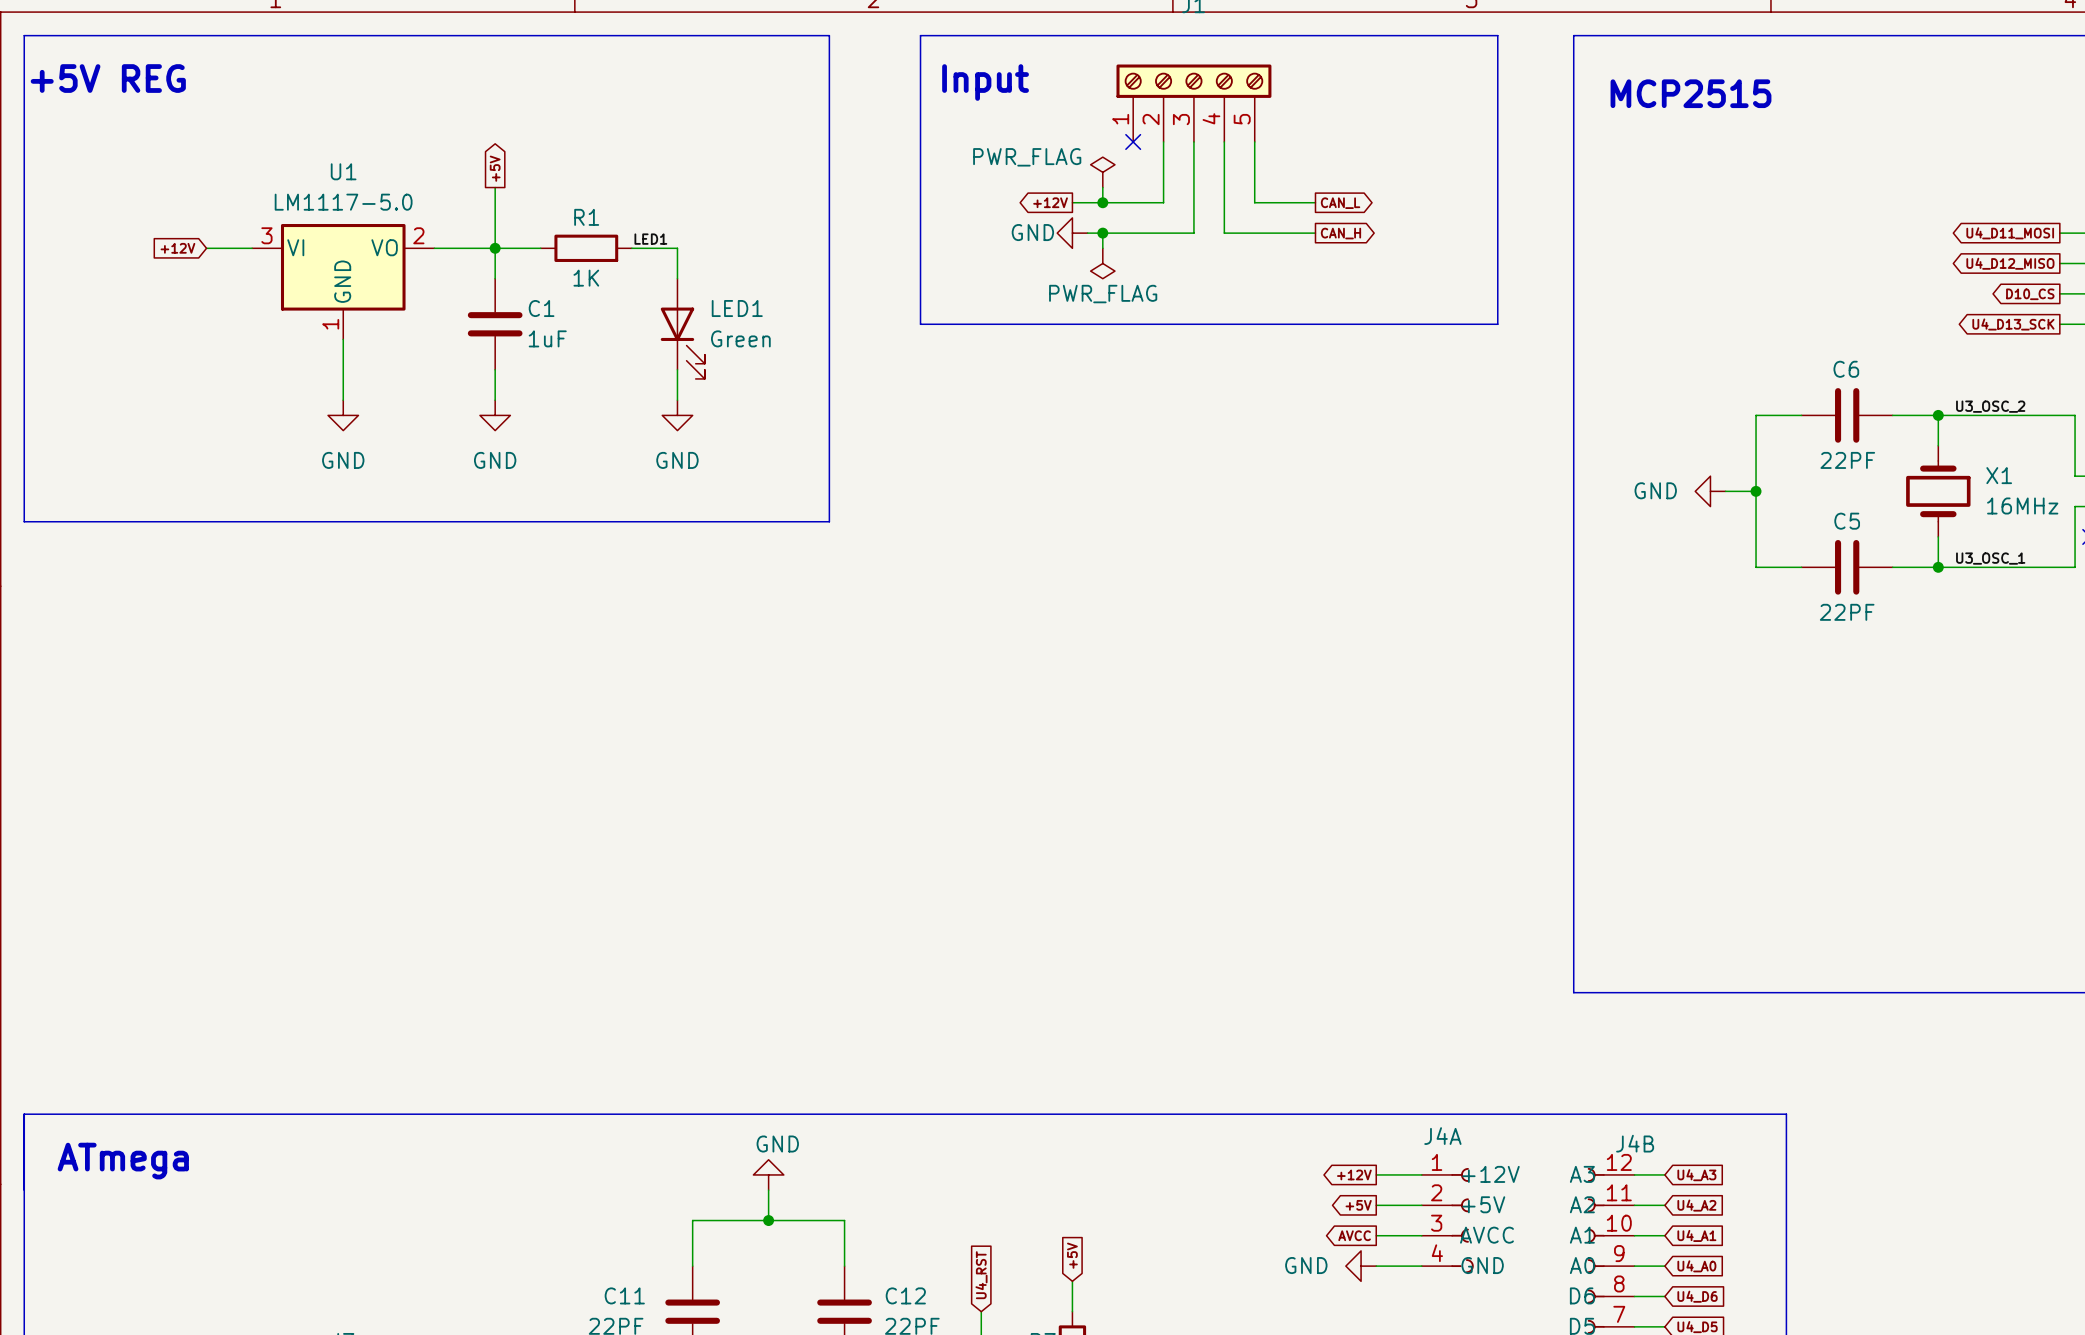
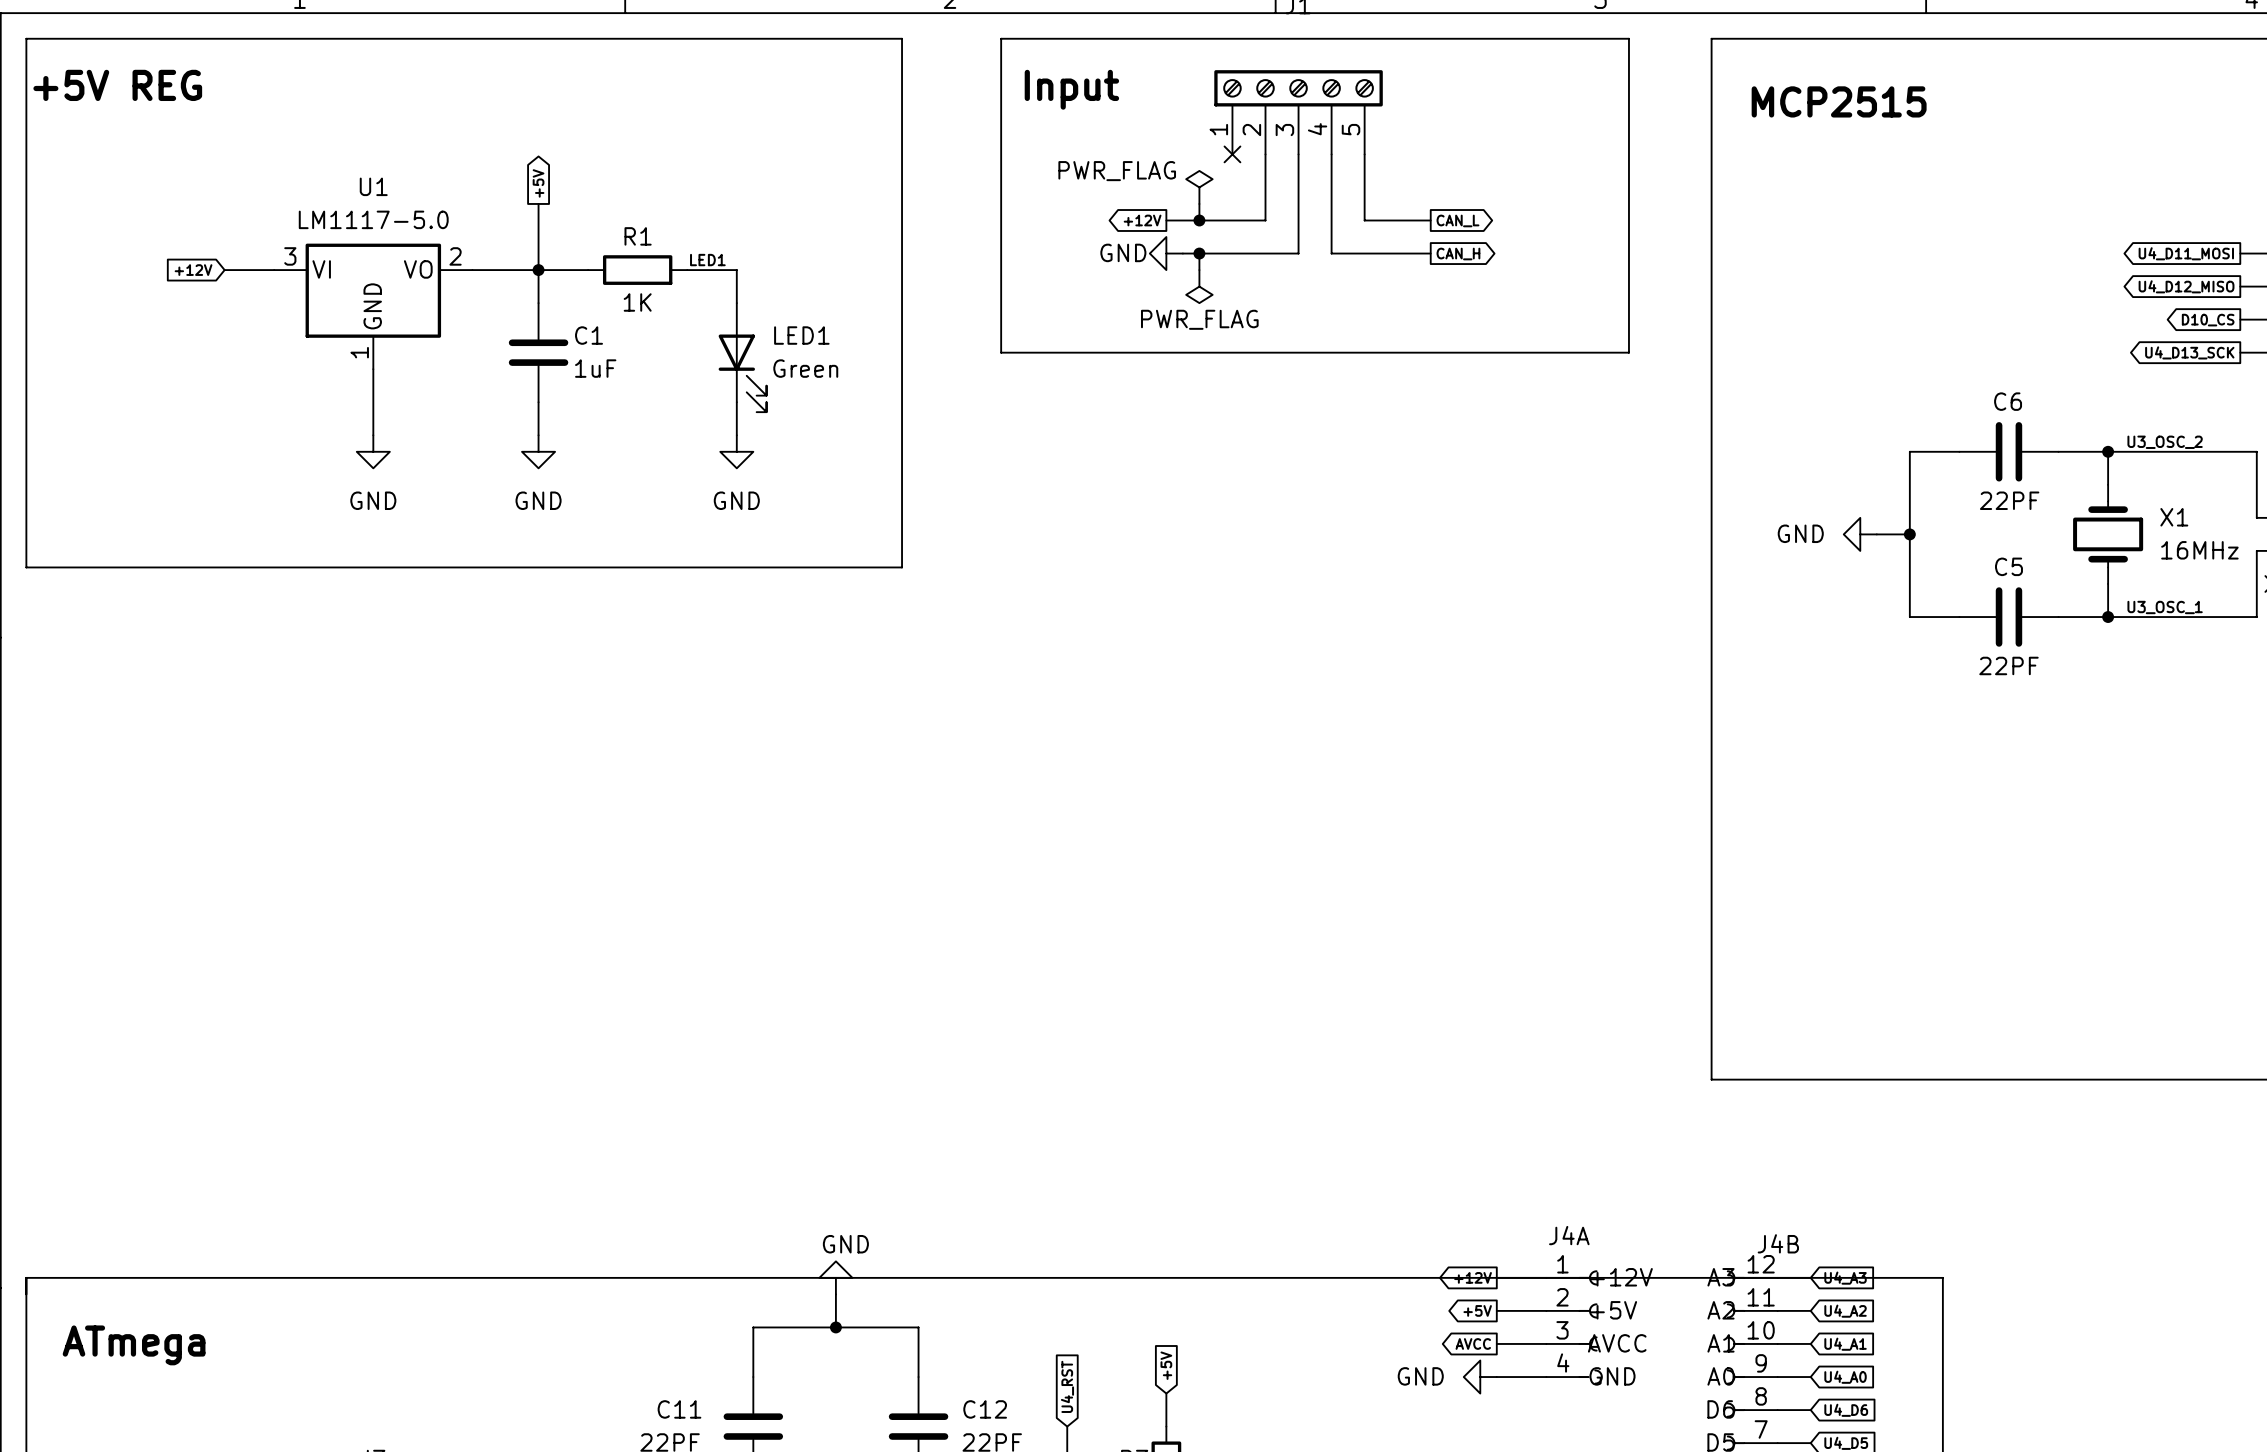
text position: ATmega (123, 1161) -> ATmega (134, 1345)
line: (24, 1174) (24, 1114) (1786, 1114) (1786, 1174) -> (26, 1277) (1942, 1277)

